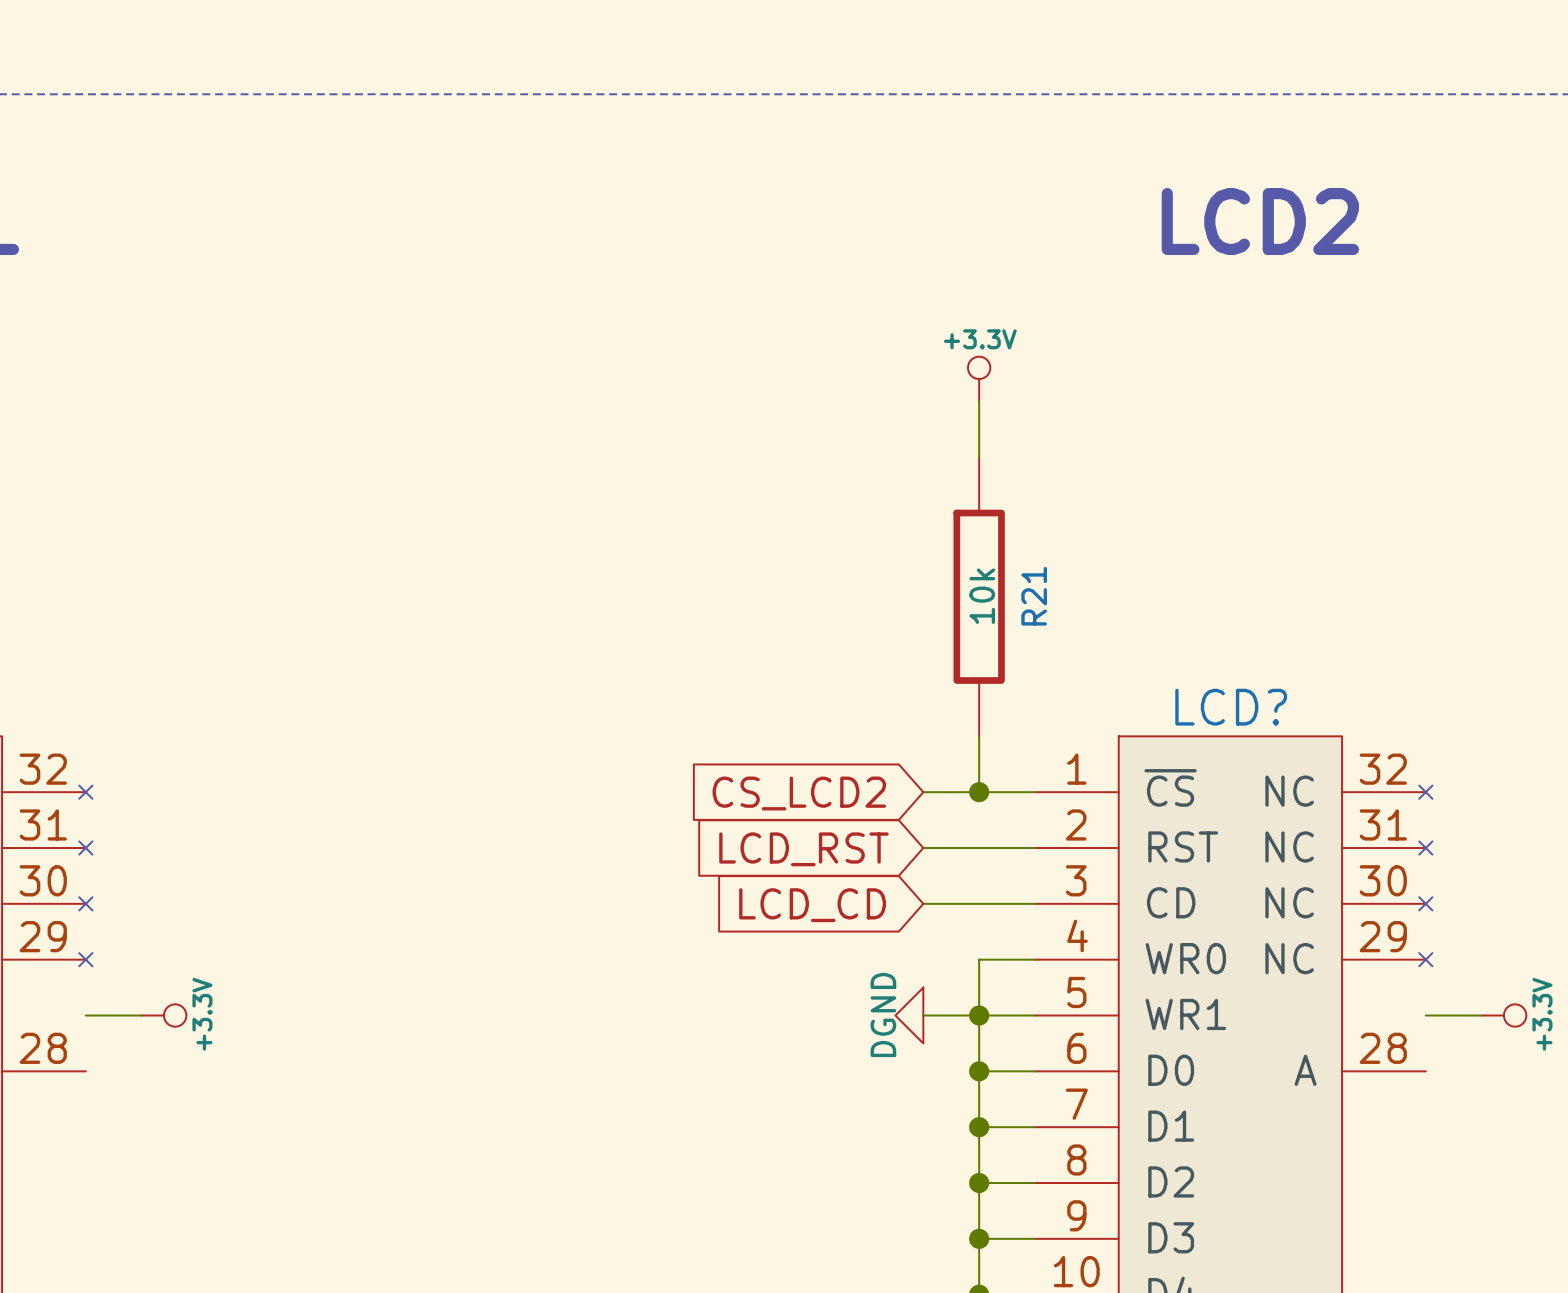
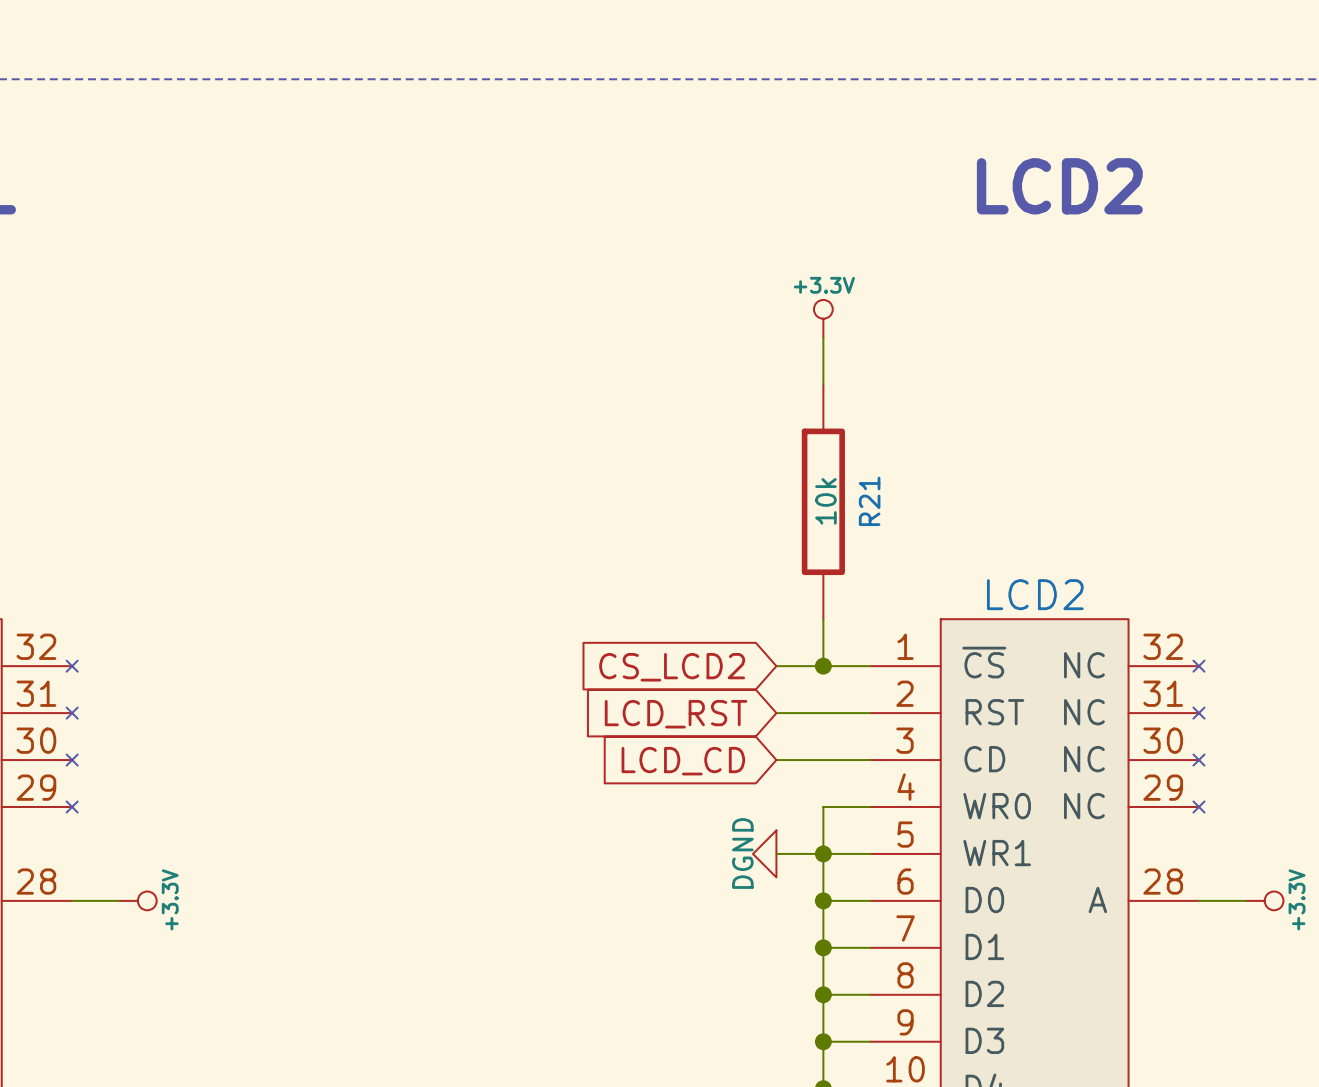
LCD? name: LCD? (1231, 707) -> LCD2 (1035, 594)
wire: (85, 1015) (141, 1015) -> (72, 900) (119, 900)
power symbol position: +3.3V (164, 1015) -> +3.3V (137, 900)
wire: (1425, 1015) (1481, 1015) -> (1198, 900) (1245, 900)
power symbol position: +3.3V (1503, 1015) -> +3.3V (1264, 900)

